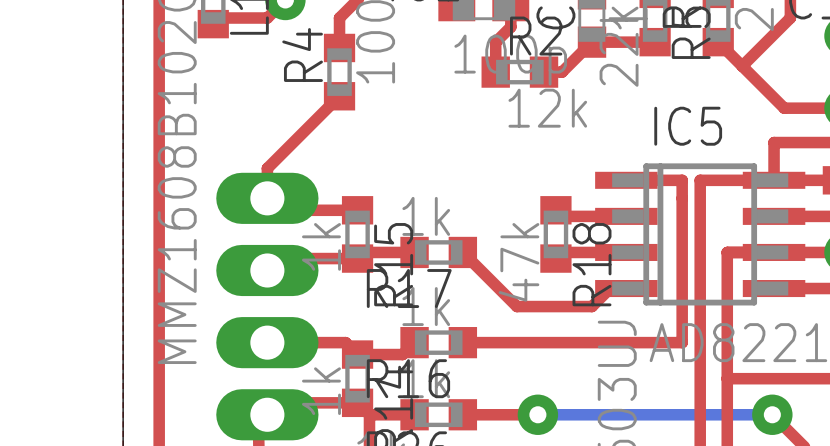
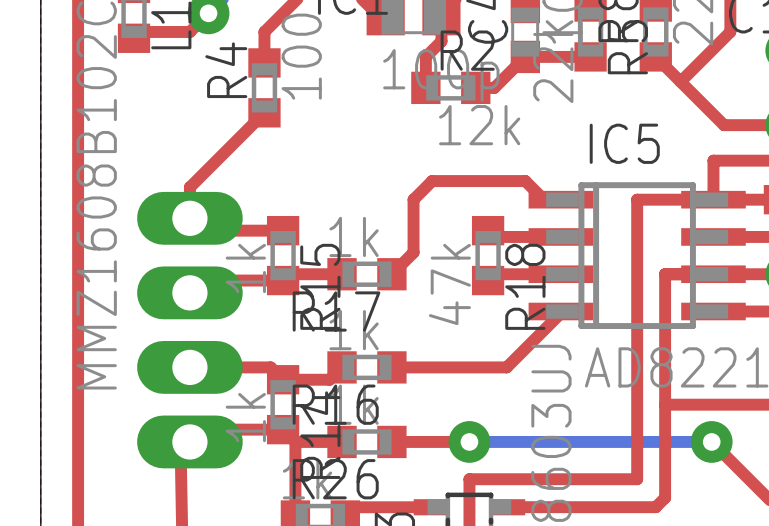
top track: (626, 180) (682, 180) (682, 342) (573, 342) -> (560, 311) (506, 367)
top track: (462, 252) (516, 306) (592, 306) (610, 288) (626, 288) -> (391, 274) (413, 252) (413, 199) (432, 181) (525, 181) (543, 199) (560, 199)

